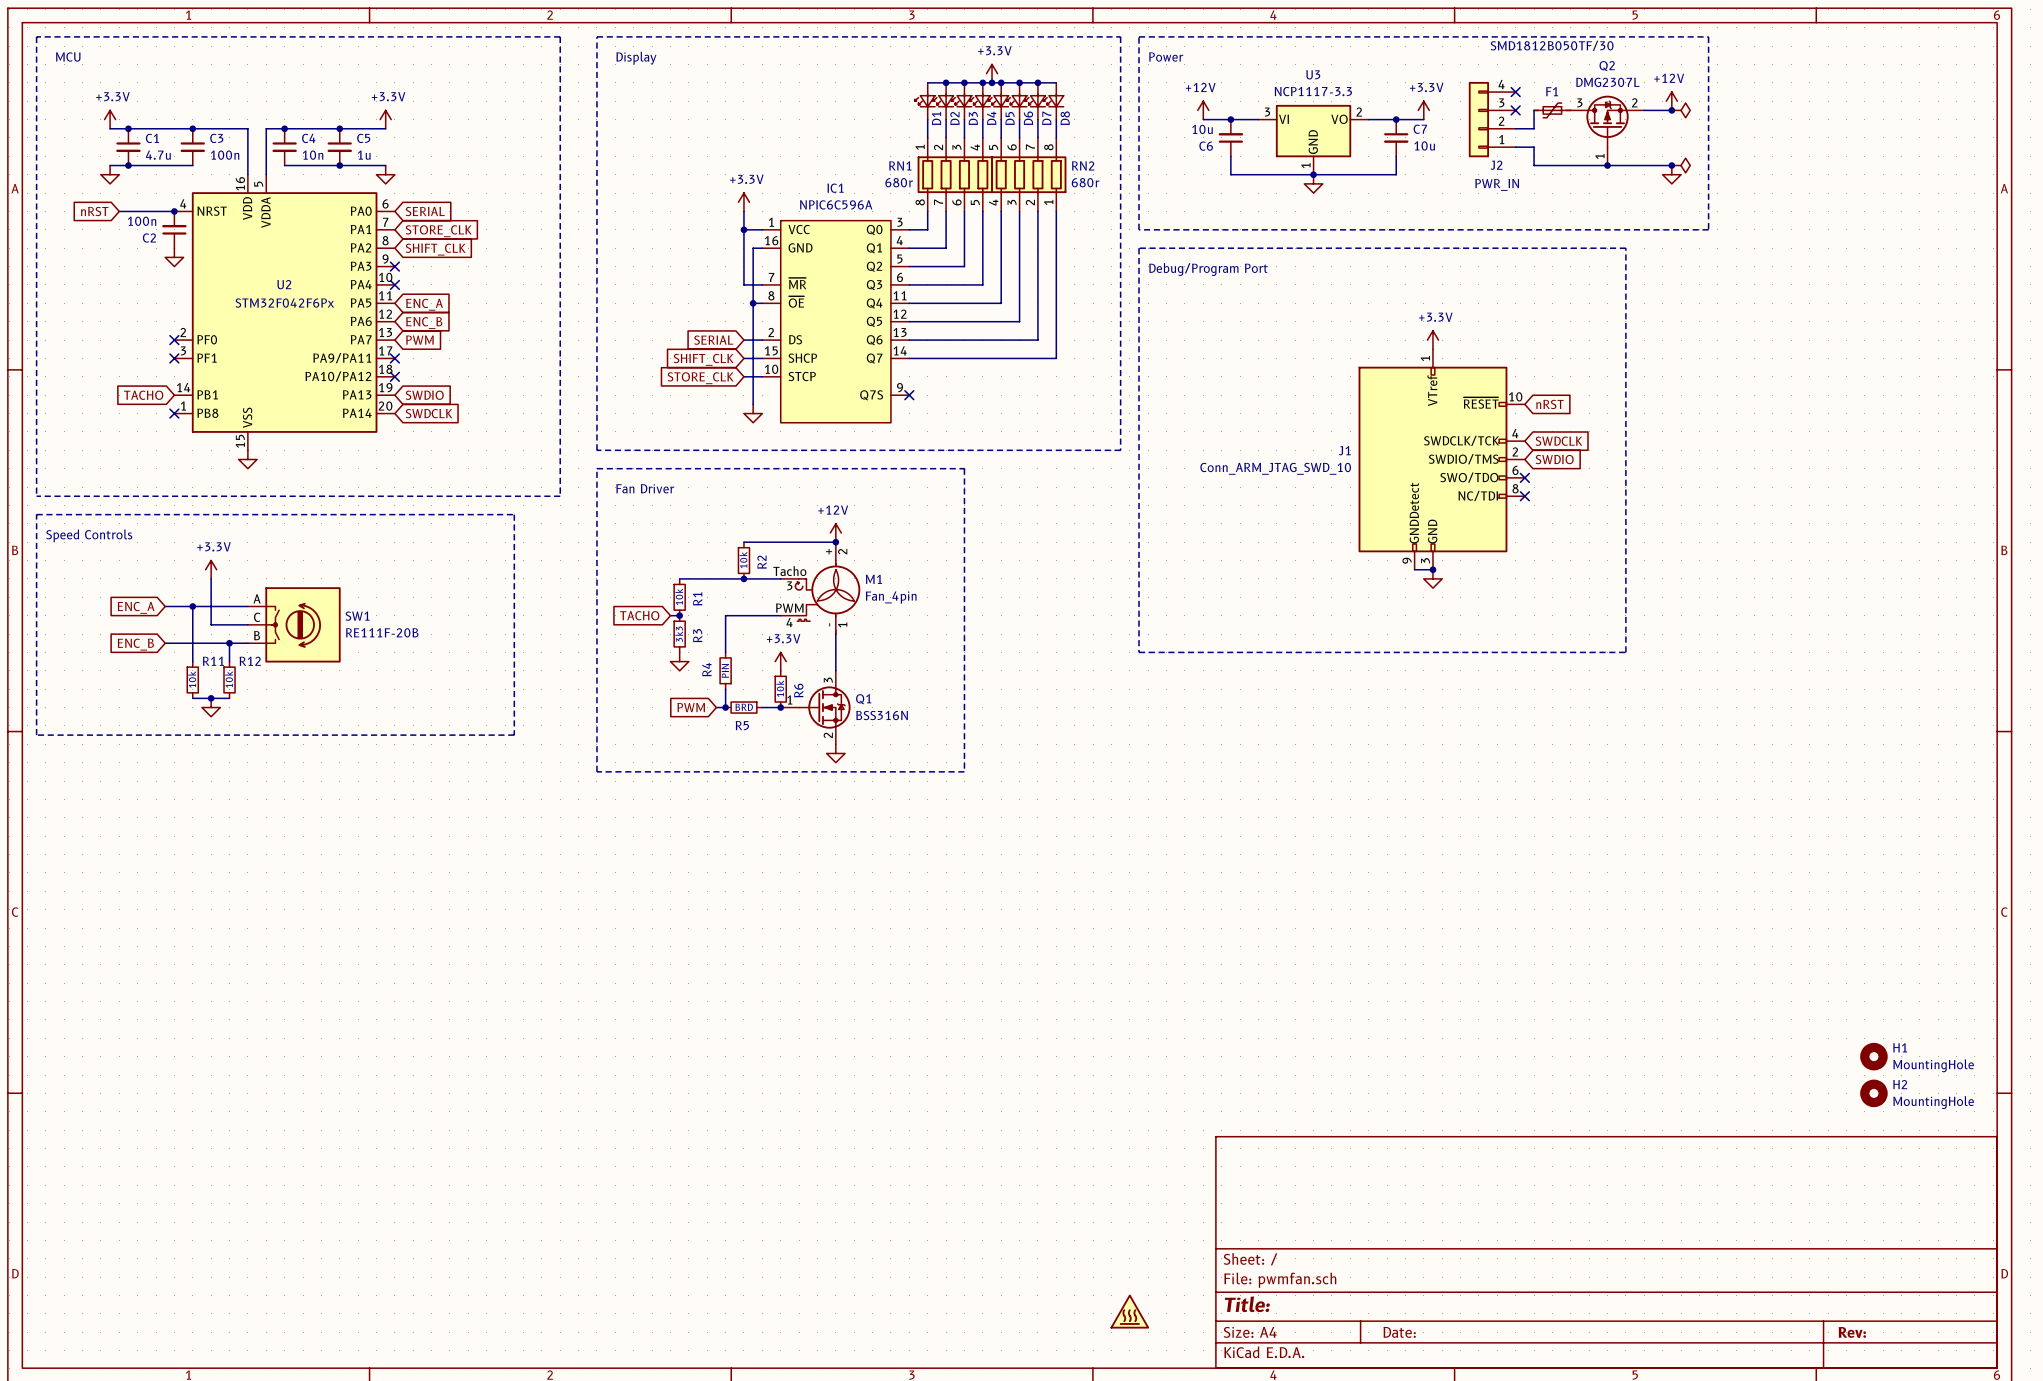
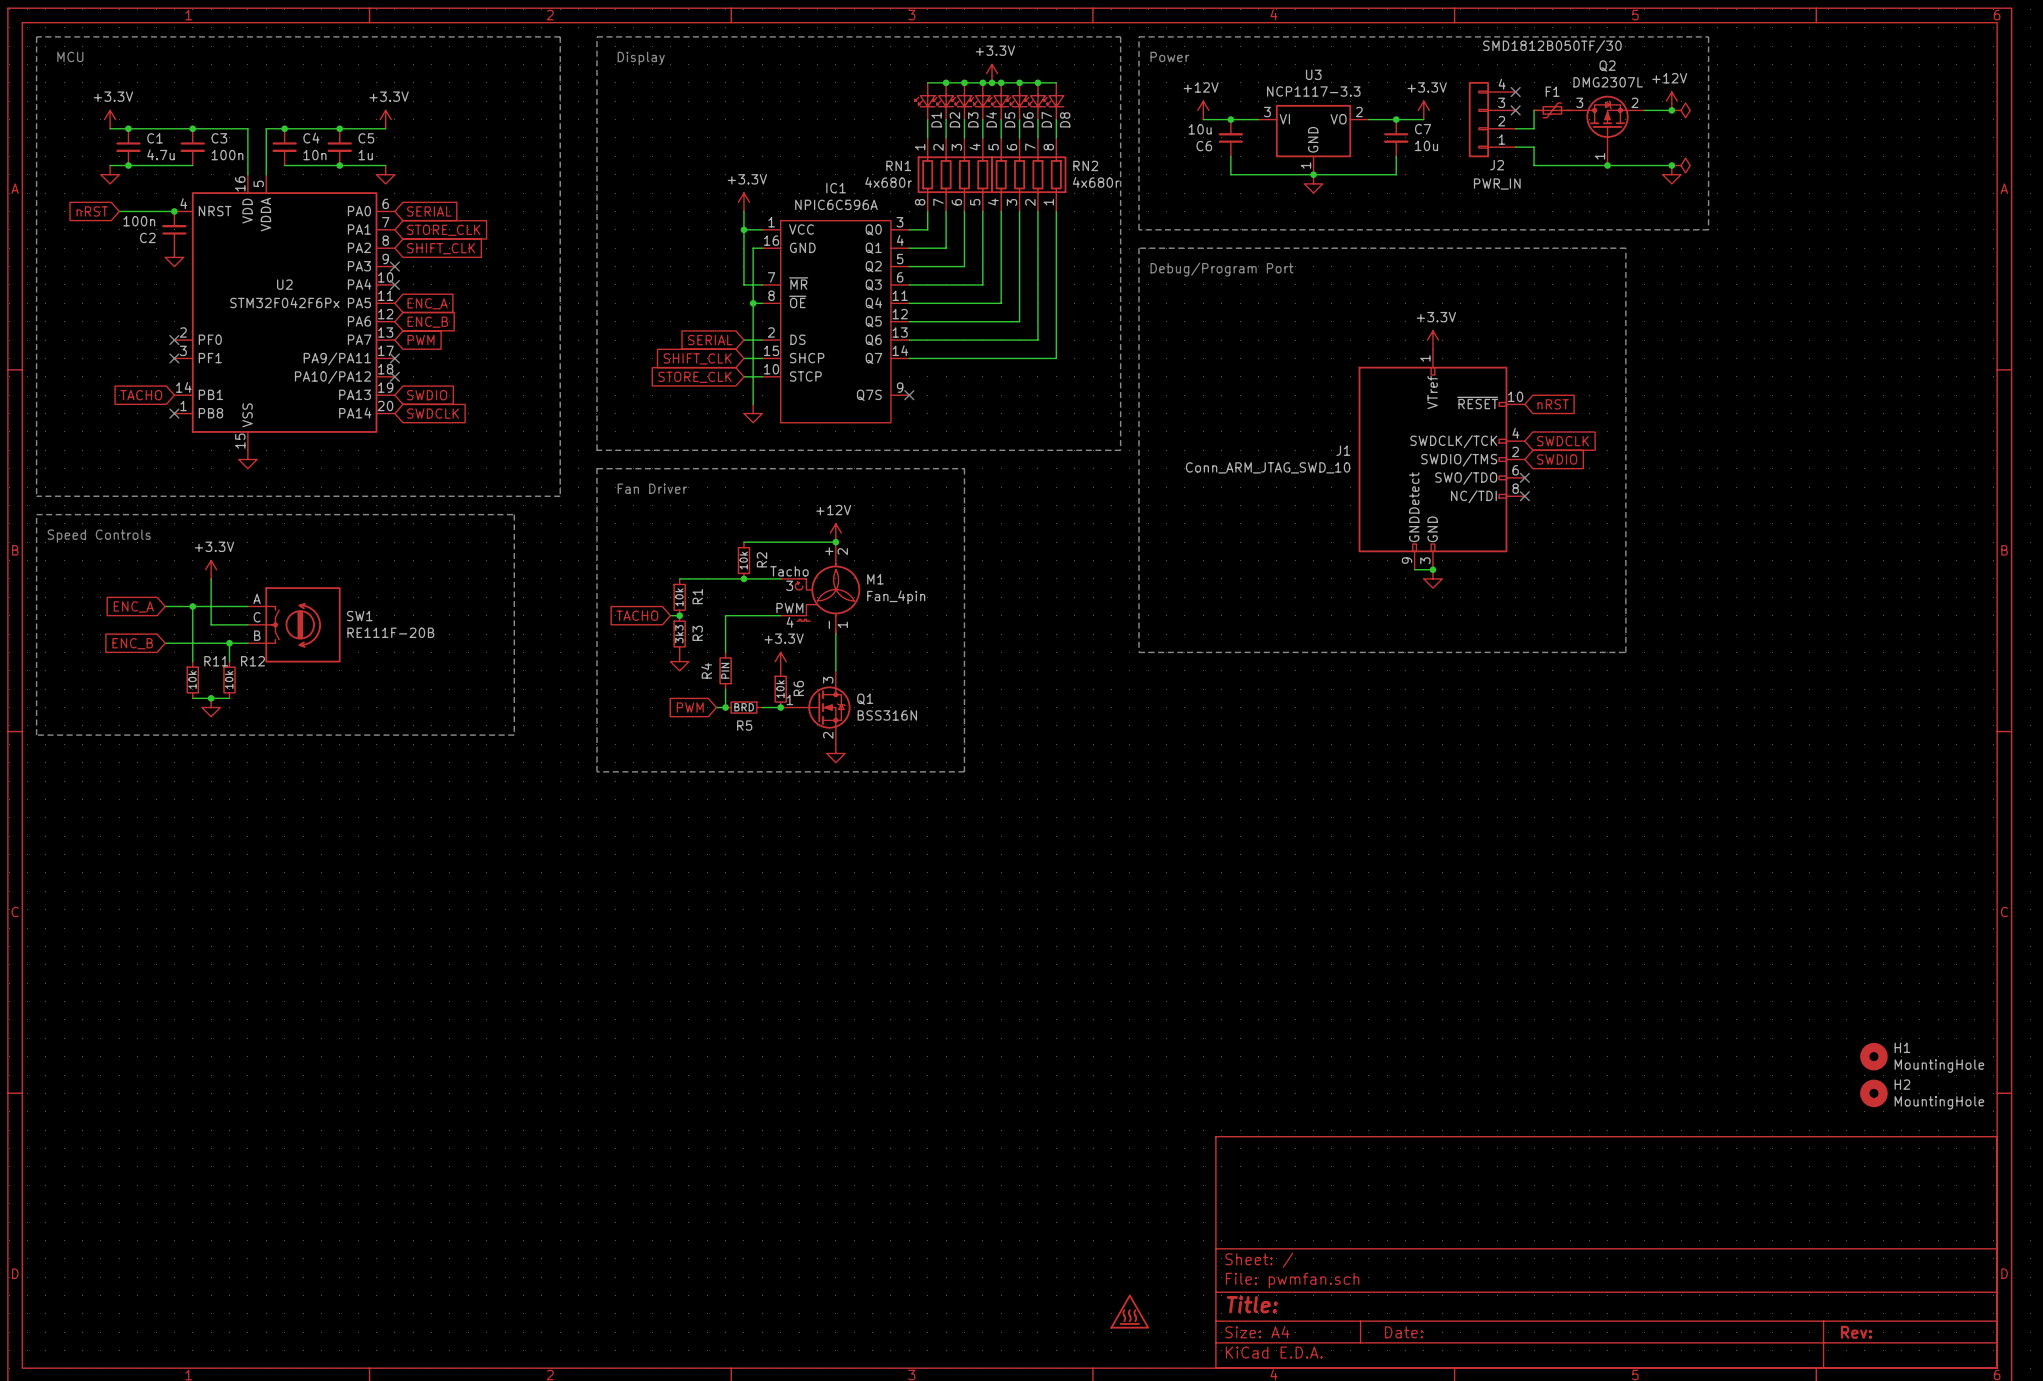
RN1 value: 680r (899, 182) -> 4x680r (888, 182)
RN2 value: 680r (1085, 182) -> 4x680r (1096, 182)

